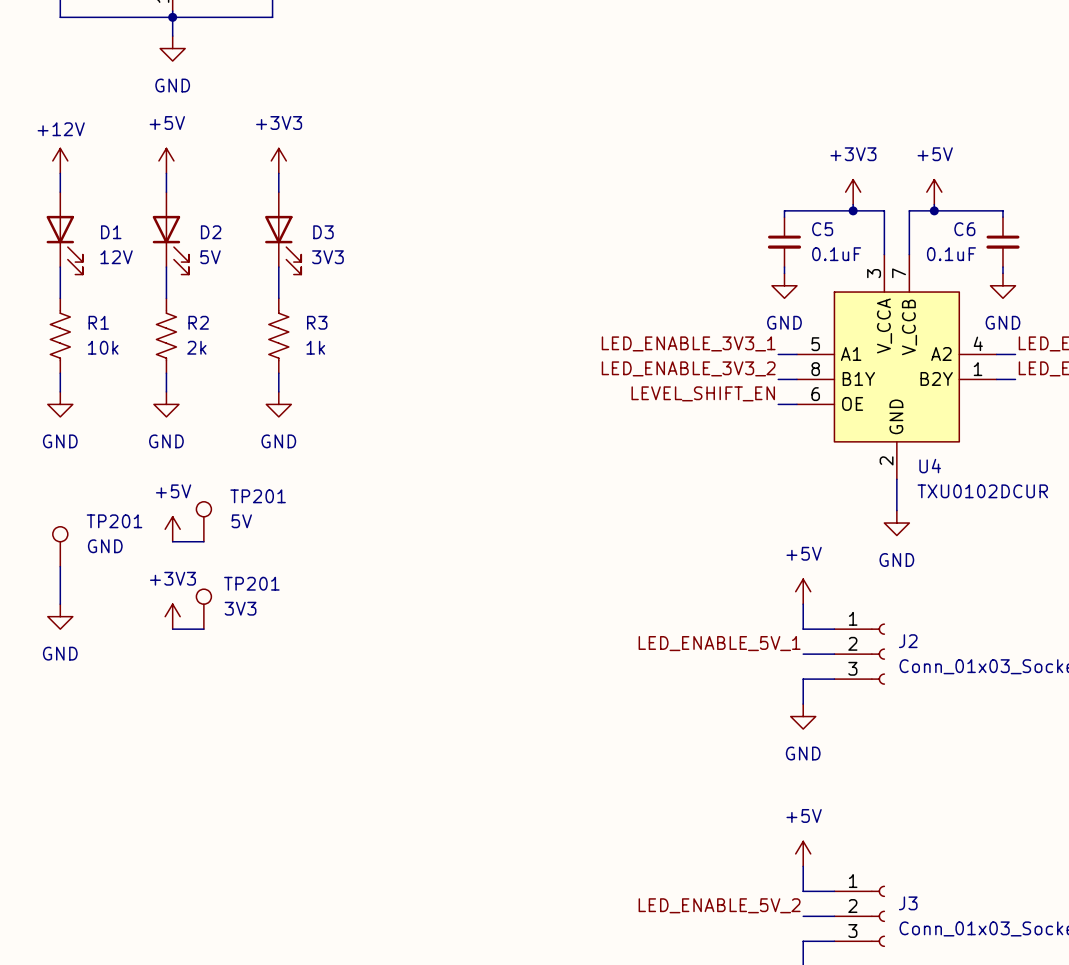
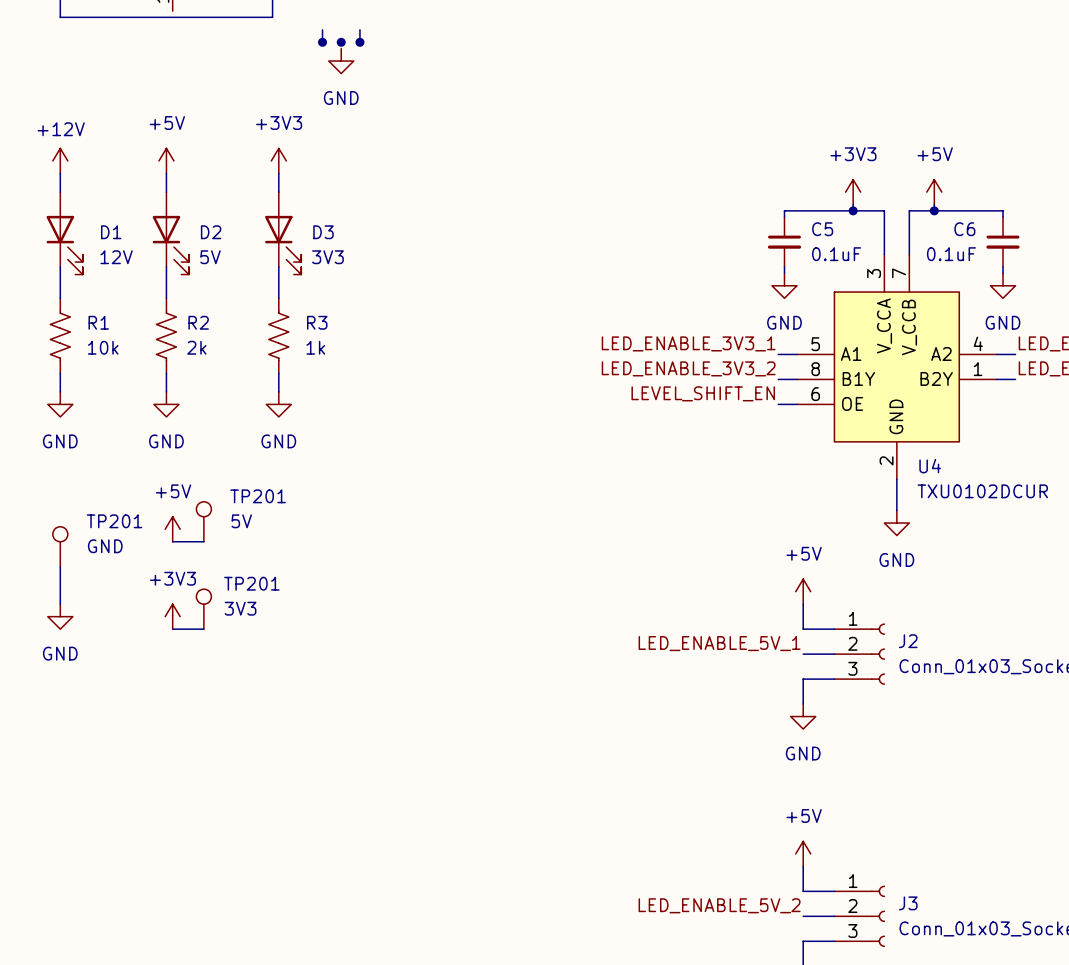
wire: (172, 11) (172, 36) -> none
junction: (172, 17) -> none
wire: none -> (322, 29) (322, 42)
wire: none -> (359, 29) (359, 42)
junction: none -> (322, 42)
junction: none -> (341, 42)
junction: none -> (359, 42)
power symbol position: GND (172, 48) -> GND (341, 61)

